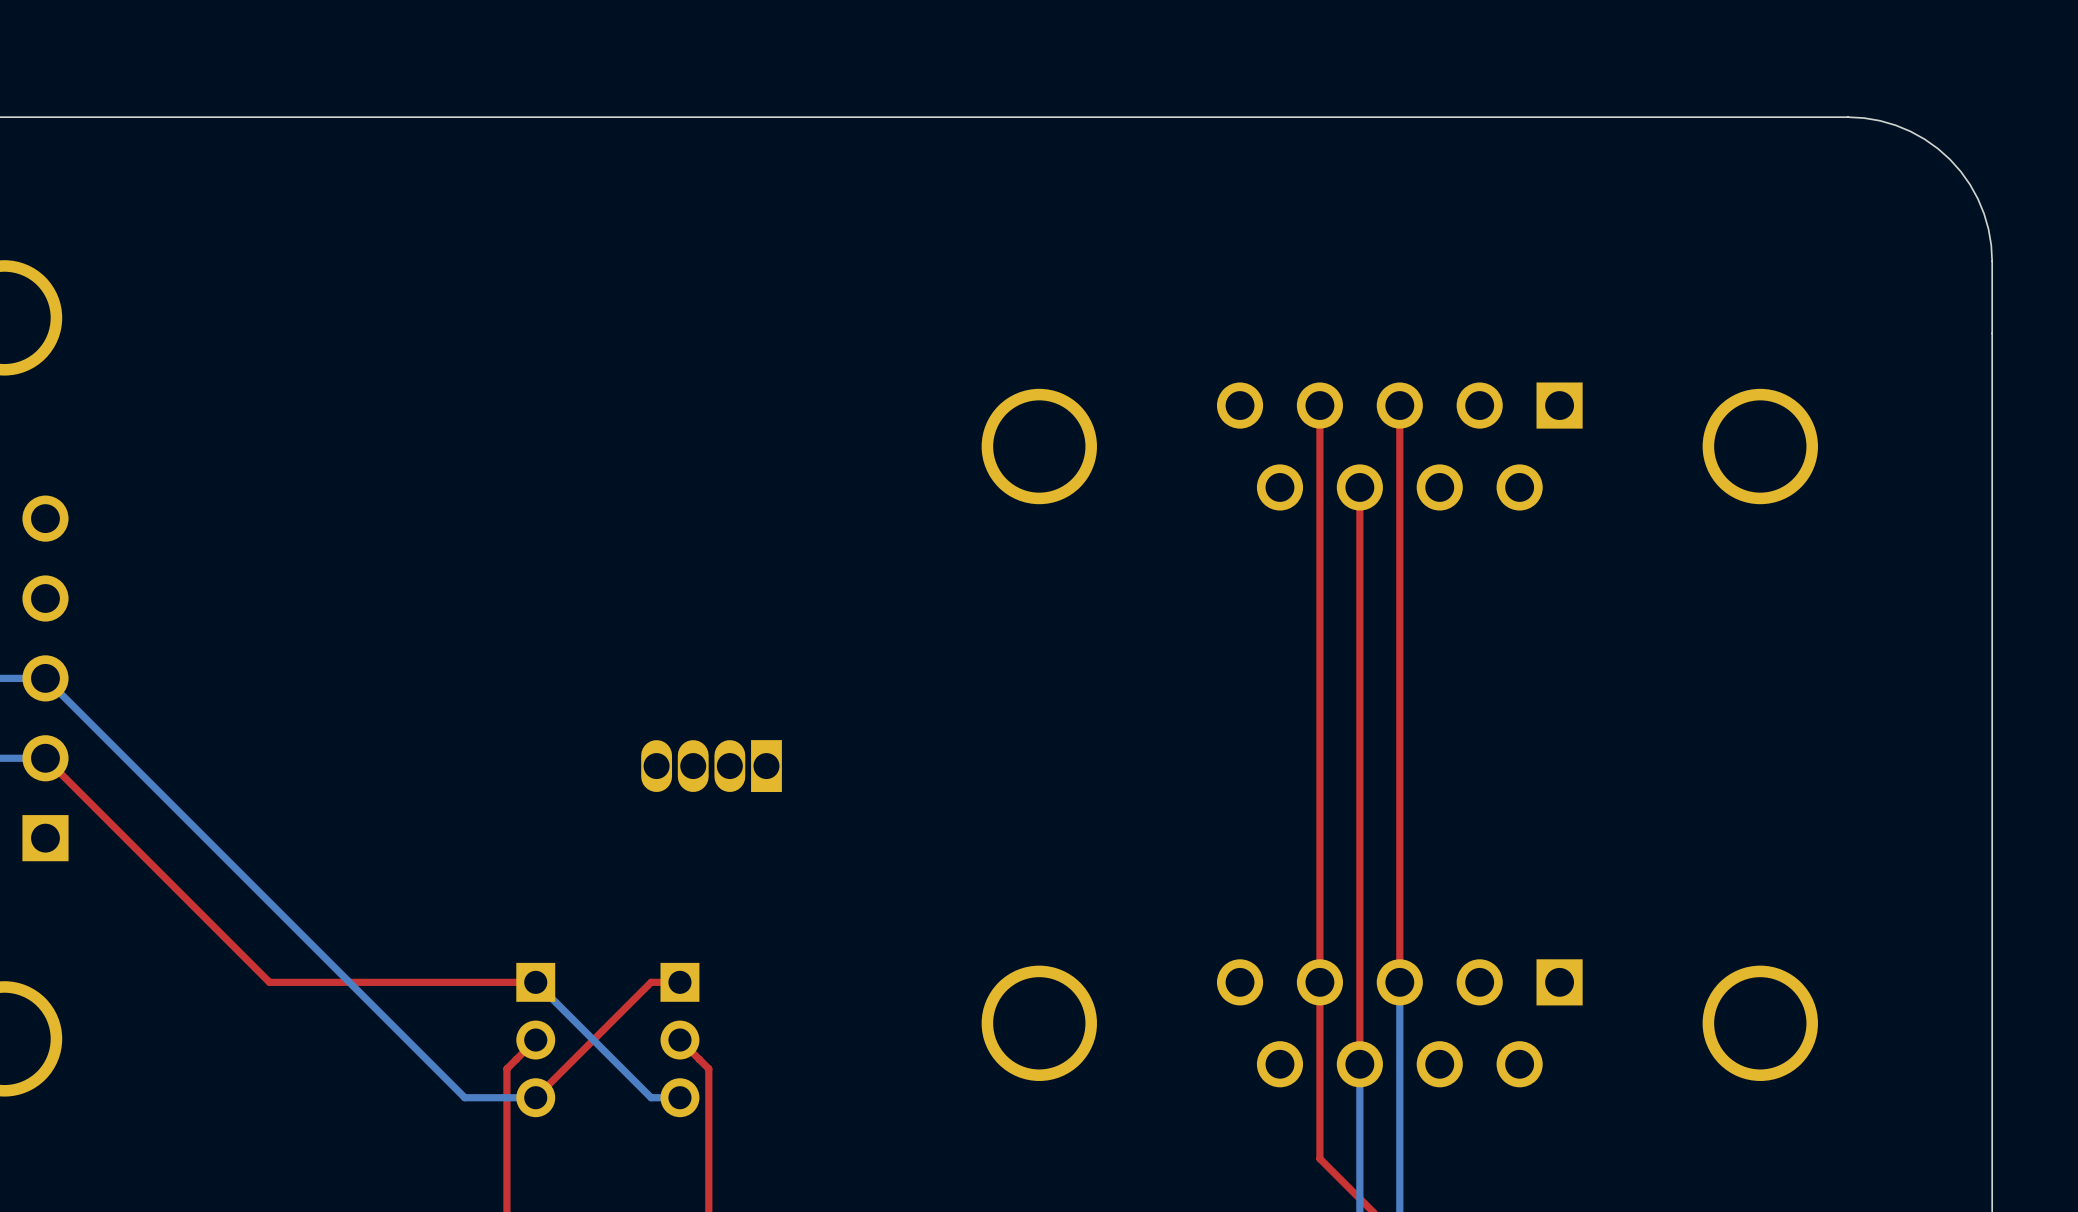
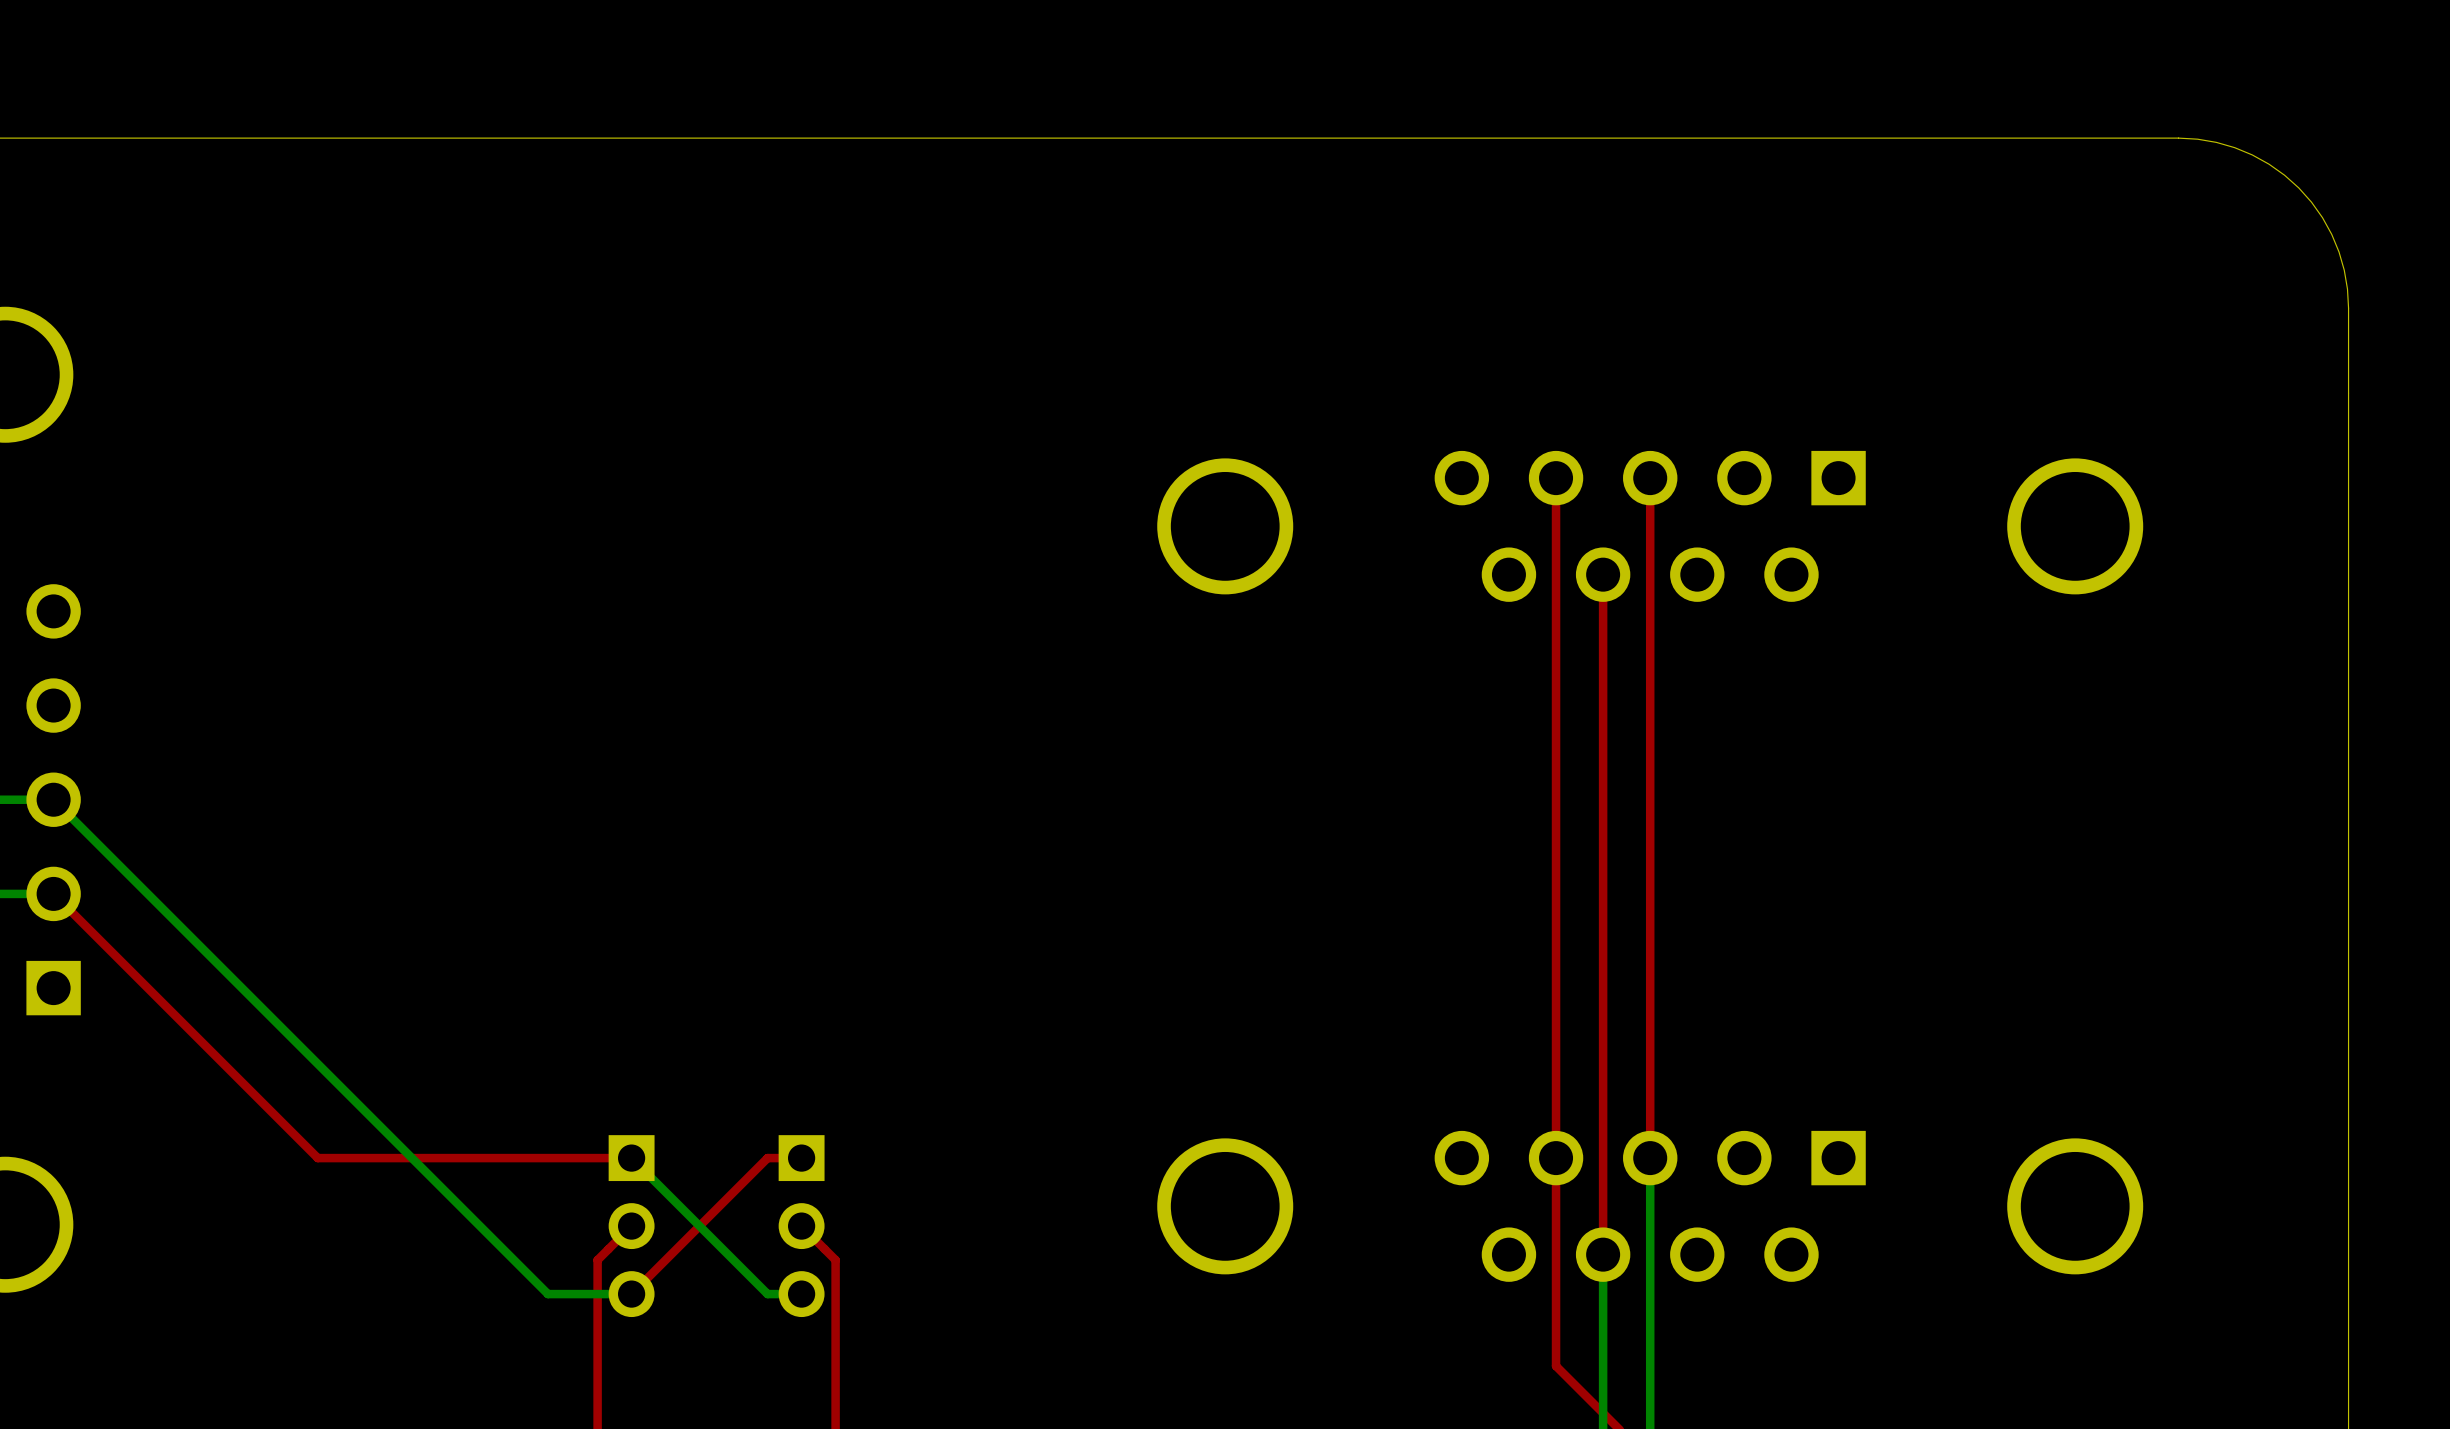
part: (711, 766) -> none

